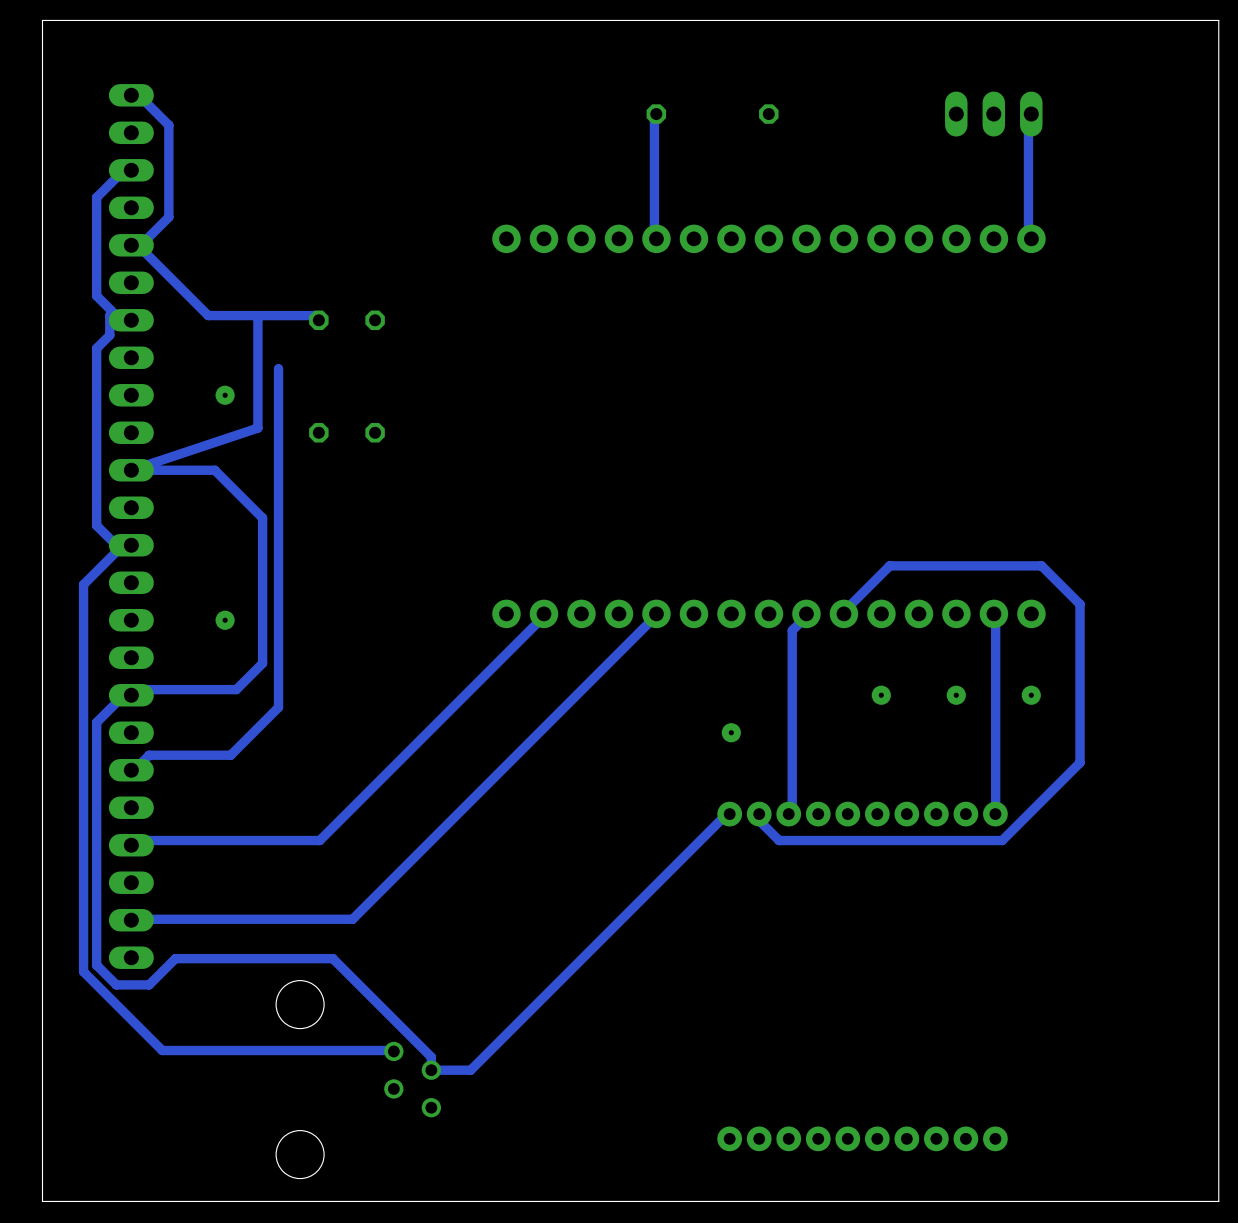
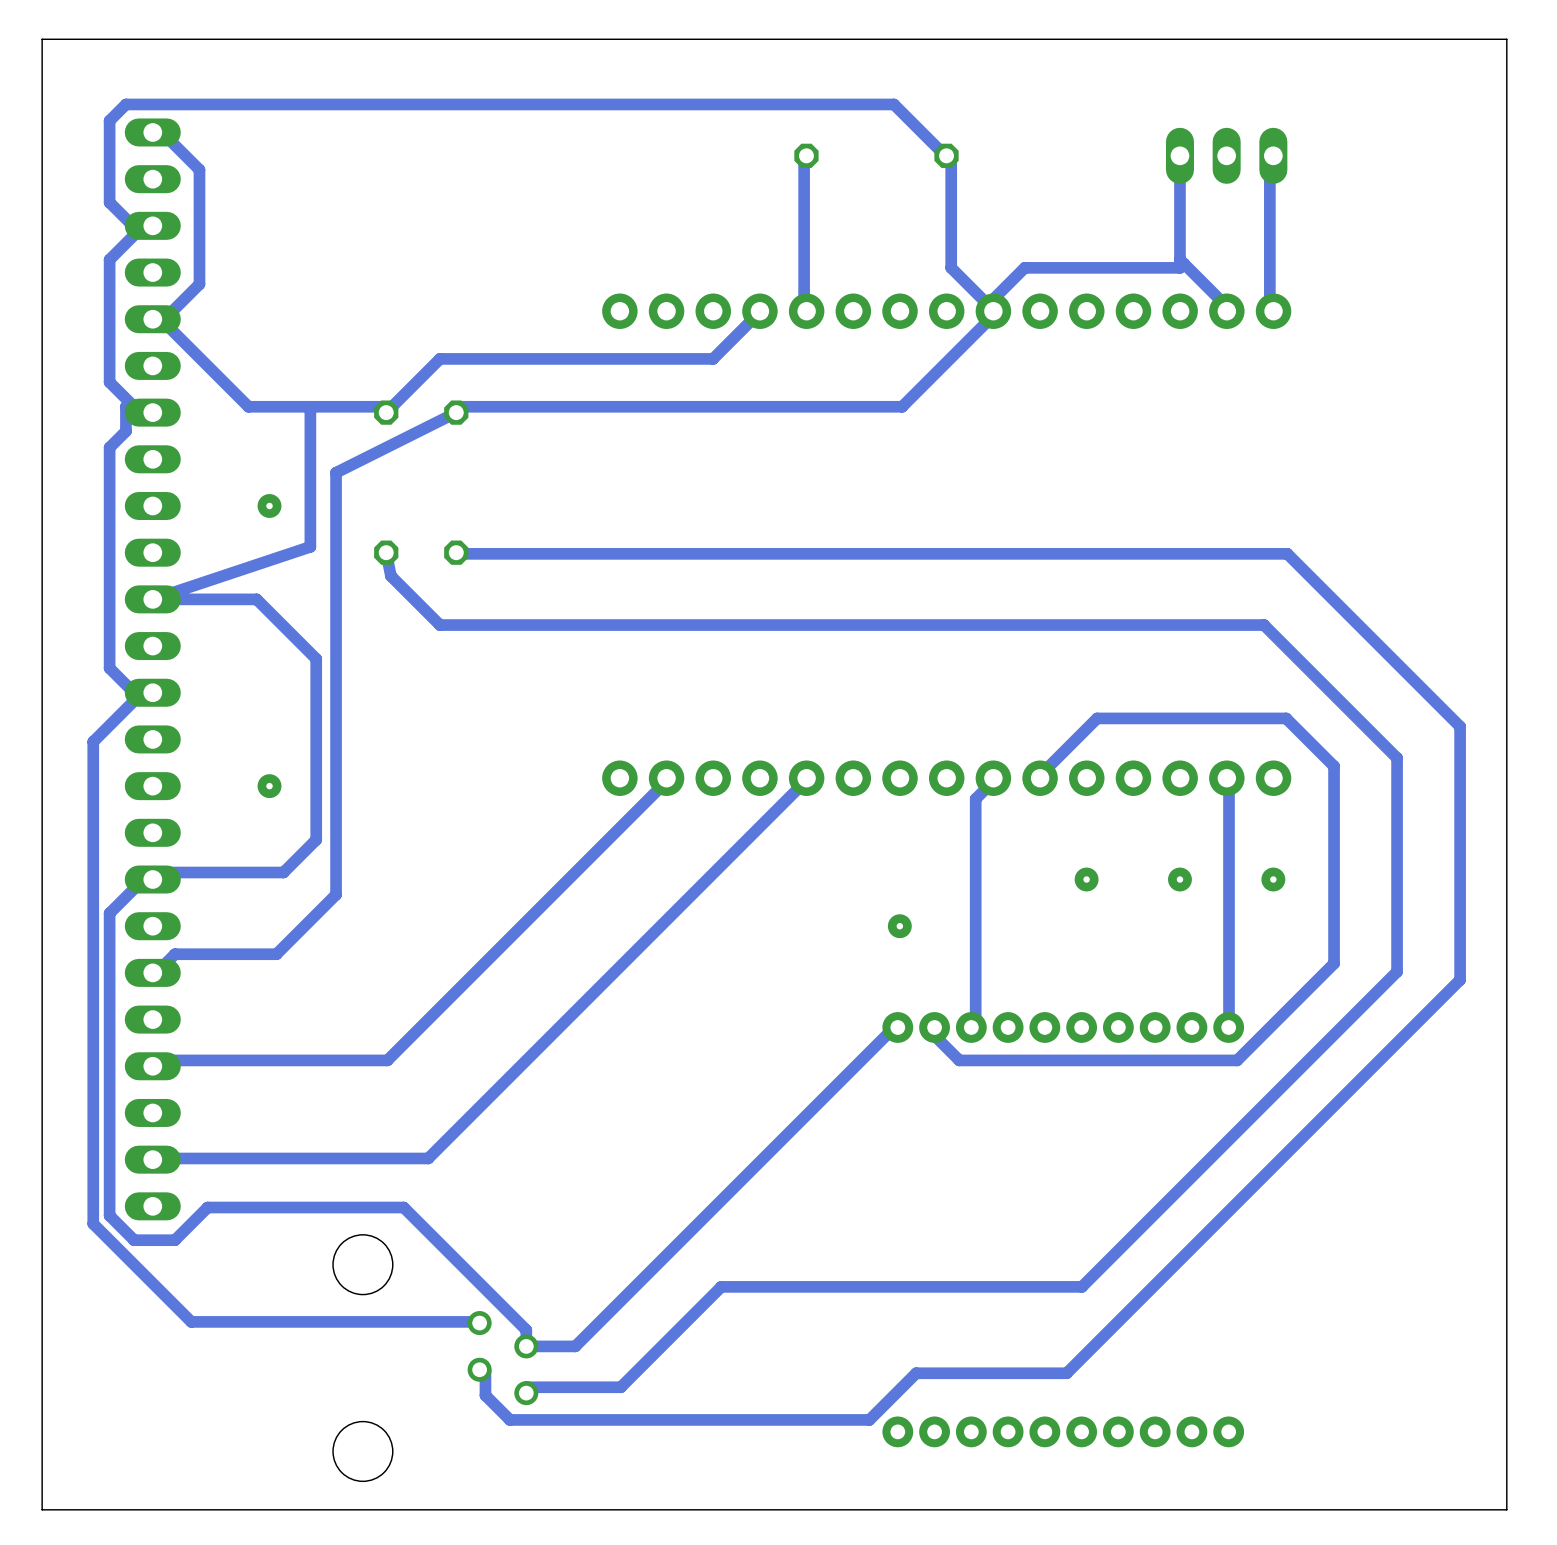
track: none -> (1179, 155) (1179, 259) (1228, 308) (1226, 311)
track: none -> (150, 218) (152, 225) (134, 227) (109, 202) (109, 120) (125, 104) (894, 104) (951, 161) (951, 267) (993, 311)
track: none -> (1184, 263) (1179, 267) (1024, 267) (992, 300) (993, 311)
track: none -> (759, 311) (713, 358) (439, 358) (386, 412) (383, 406)
track: none -> (993, 311) (992, 316) (902, 406) (459, 406) (456, 412) (336, 472)
track: none -> (386, 552) (390, 576) (439, 625) (1264, 625) (1397, 758) (1397, 971) (1081, 1286) (721, 1286) (620, 1387) (526, 1387) (526, 1393)
track: none -> (456, 552) (1287, 553) (1460, 726) (1460, 979) (1066, 1373) (916, 1373) (869, 1419) (509, 1419) (485, 1395) (485, 1370) (479, 1369)

